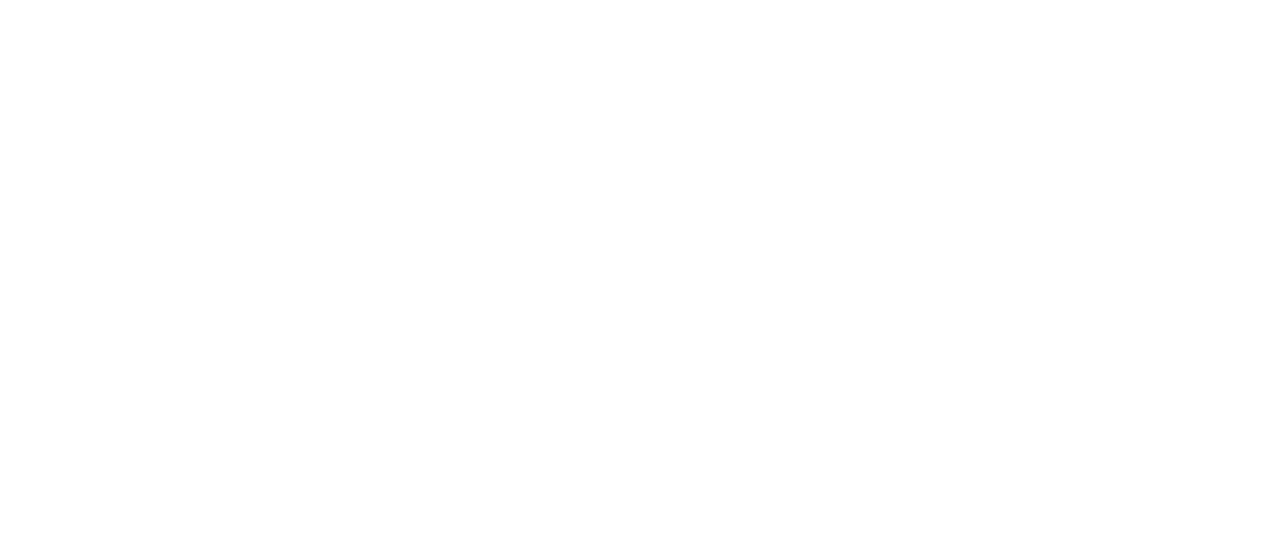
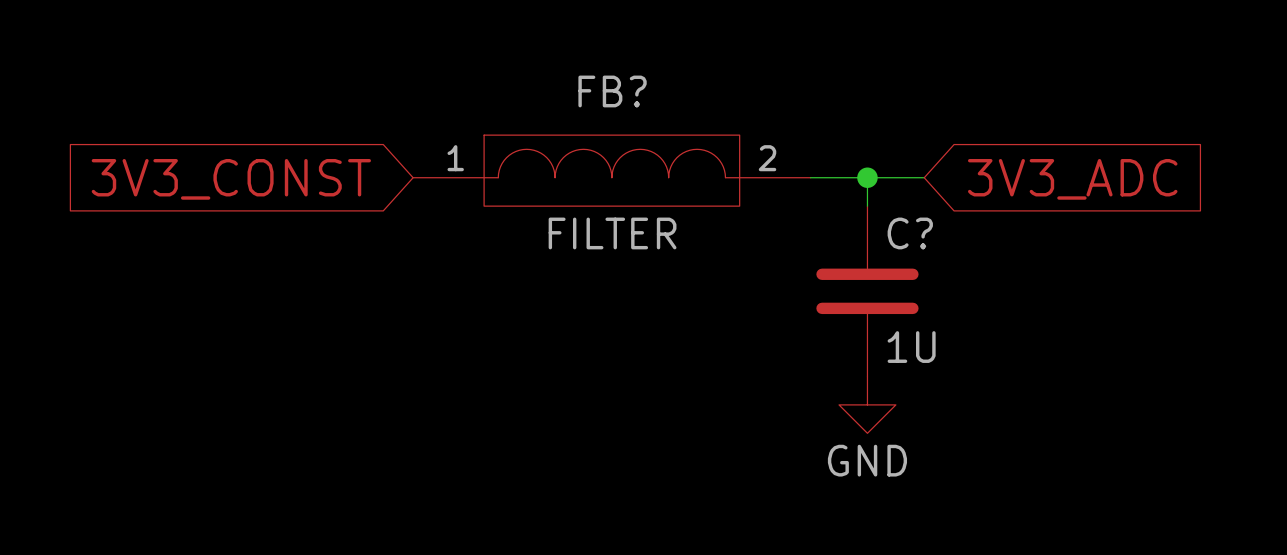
FB?: none -> FILTER (611, 170)
wire: none -> (810, 177) (924, 177)
wire: none -> (867, 177) (867, 206)
junction: none -> (867, 177)
global label: none -> 3V3_CONST (231, 179)
global label: none -> 3V3_ADC (1072, 179)
C?: none -> 1U (867, 291)
power symbol: none -> GND (867, 404)

